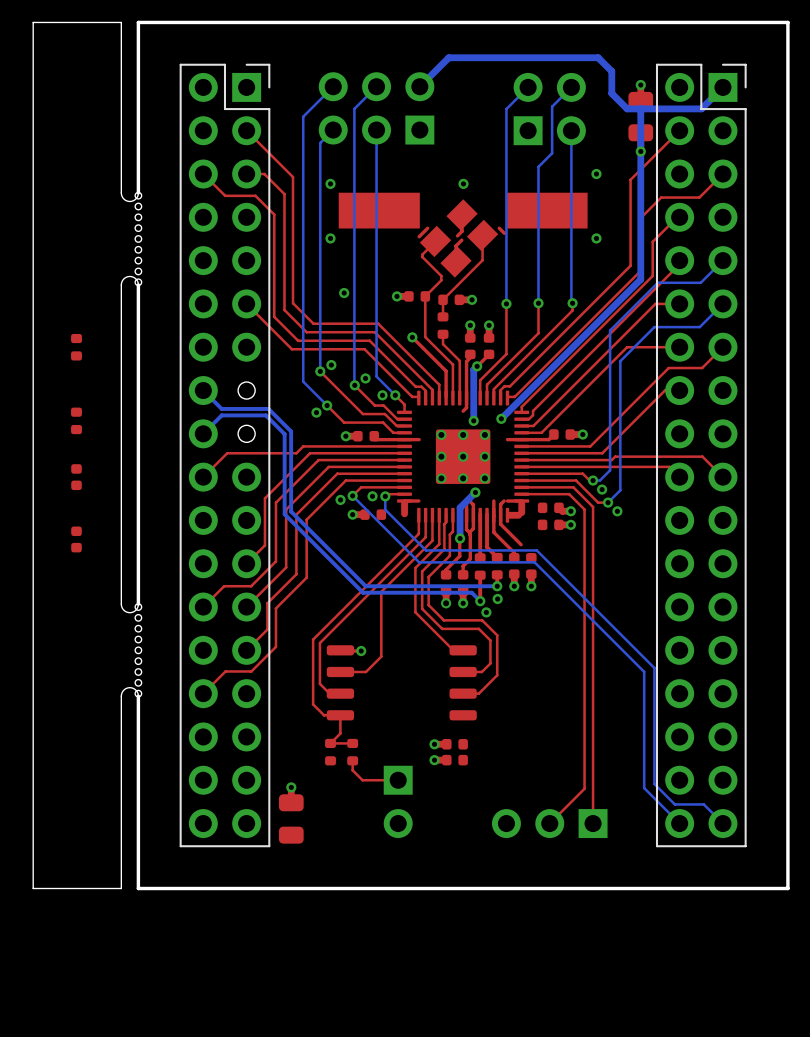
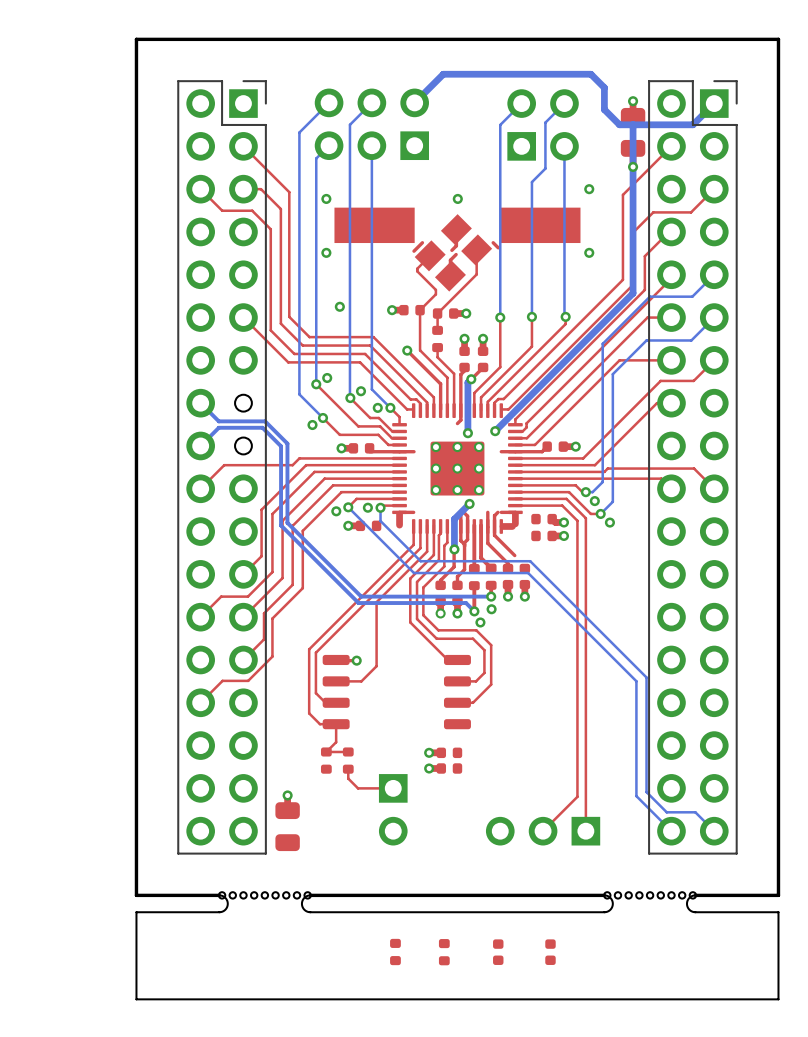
board edge: (138, 192) (136, 198) (130, 201) (124, 199) (121, 193) (121, 22) (33, 22) (33, 888) (121, 888) (121, 695) (124, 689) (130, 687) (136, 690) (138, 696) -> (136, 614) (136, 705)
part: (138, 238) -> none
board edge: (138, 285) (135, 278) (129, 276) (123, 278) (121, 285) (121, 604) (124, 610) (129, 612) (136, 609) (138, 604) -> (136, 298) (136, 207)
part: (76, 347) -> none
part: (76, 420) -> none
part: (76, 477) -> none
part: (76, 539) -> none
part rotation: 0° (138, 650) -> 90° clockwise (264, 895)
part position: (138, 650) -> (264, 895)
board edge: (314, 888) (222, 888) -> (310, 895) (304, 897) (301, 903) (304, 909) (310, 912) (604, 912) (610, 910) (612, 903) (610, 897) (604, 895)
part: none -> (650, 895)
board edge: (703, 888) (611, 888) -> (695, 895) (689, 897) (687, 902) (688, 908) (693, 911) (778, 912) (778, 999) (136, 999) (136, 912) (221, 911) (226, 908) (227, 902) (224, 897) (219, 895)
part: none -> (395, 952)
part: none -> (444, 952)
part: none -> (498, 952)
part: none -> (550, 952)

